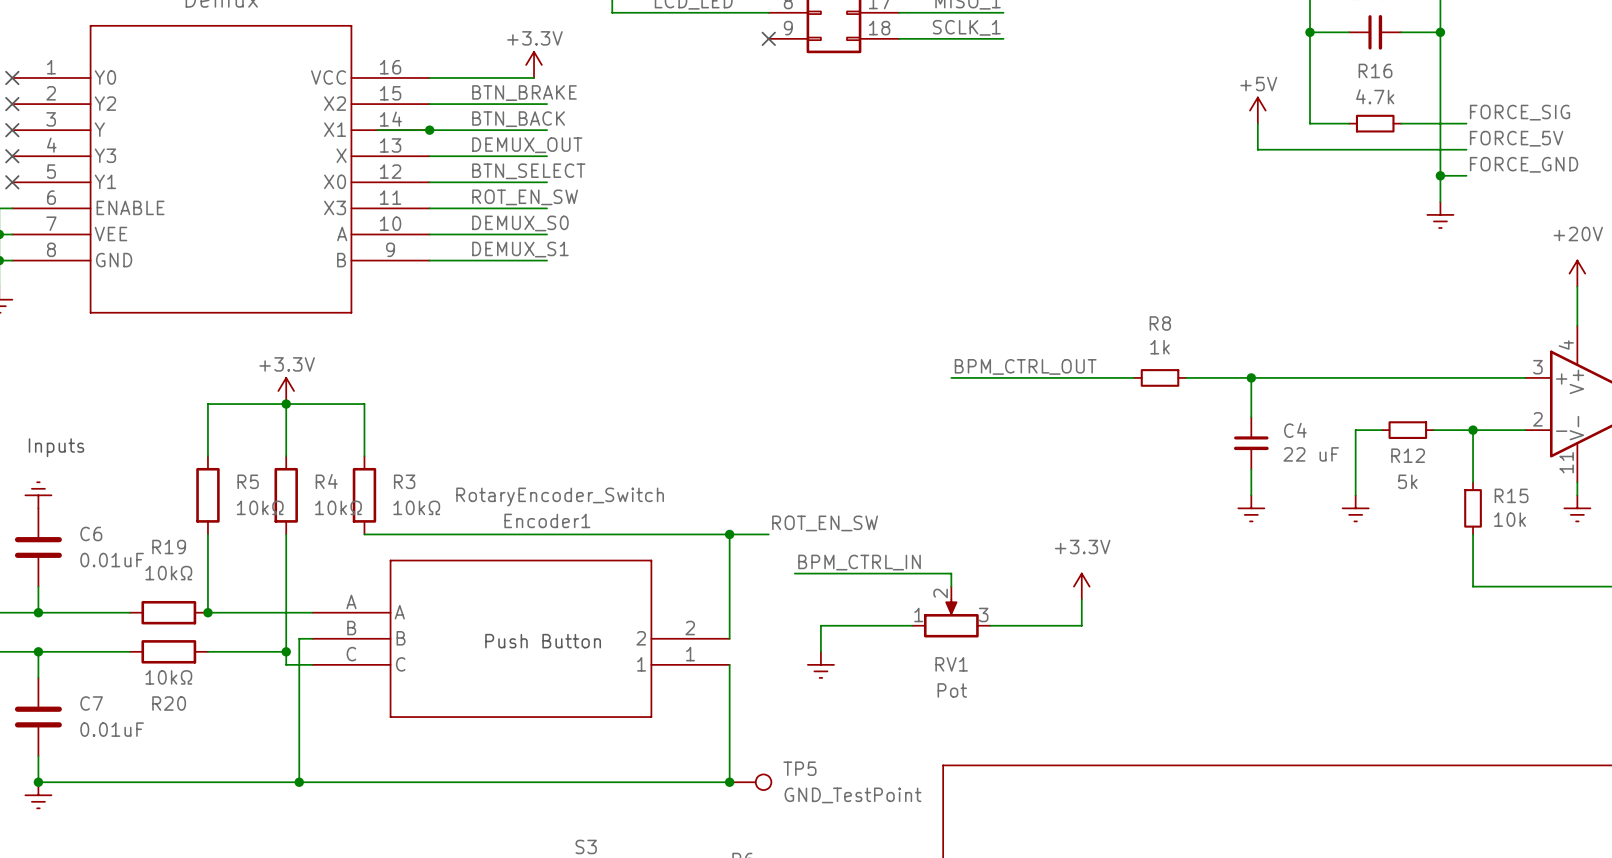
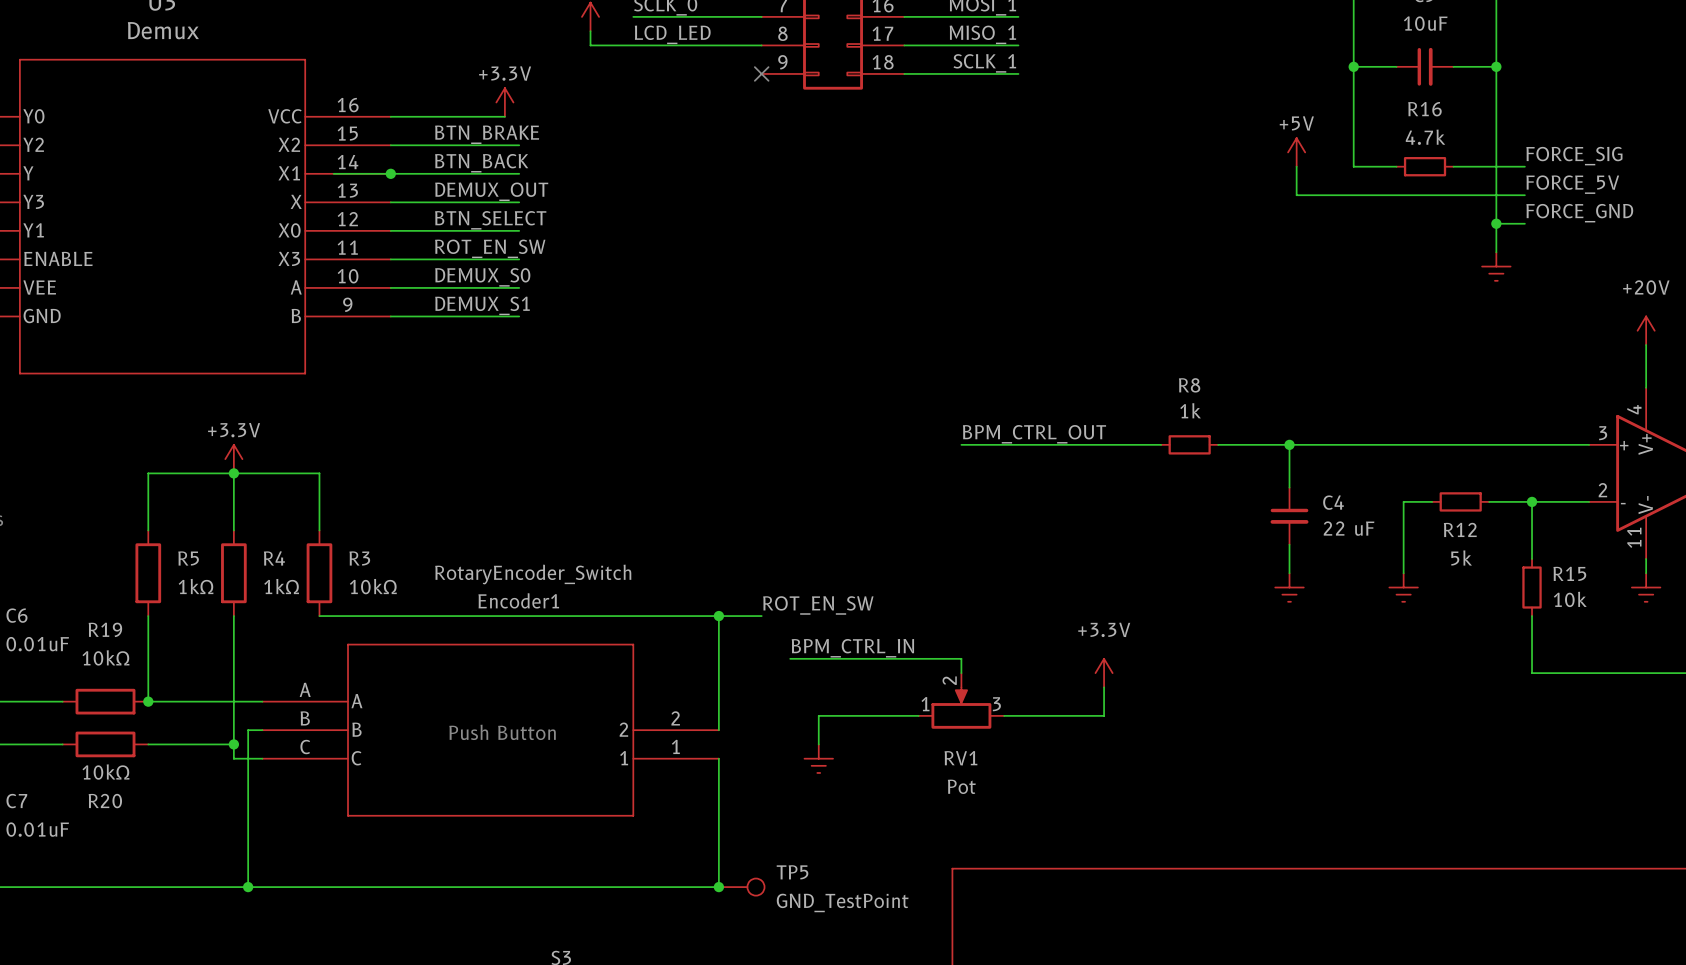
R5 value: 10kΩ (260, 507) -> 1kΩ (196, 586)
R4 value: 10kΩ (338, 507) -> 1kΩ (281, 586)

